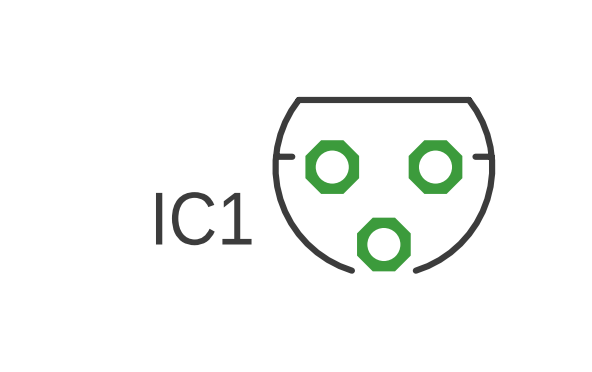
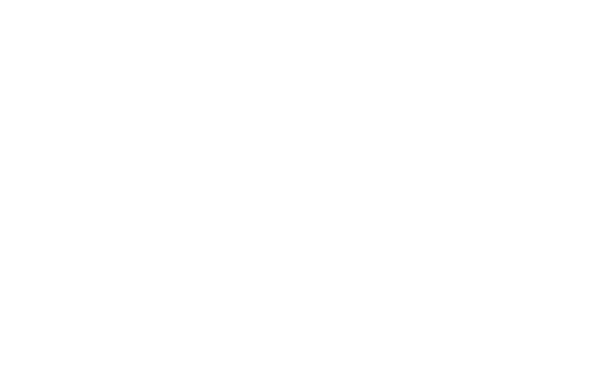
IC1: (383, 185) -> none

